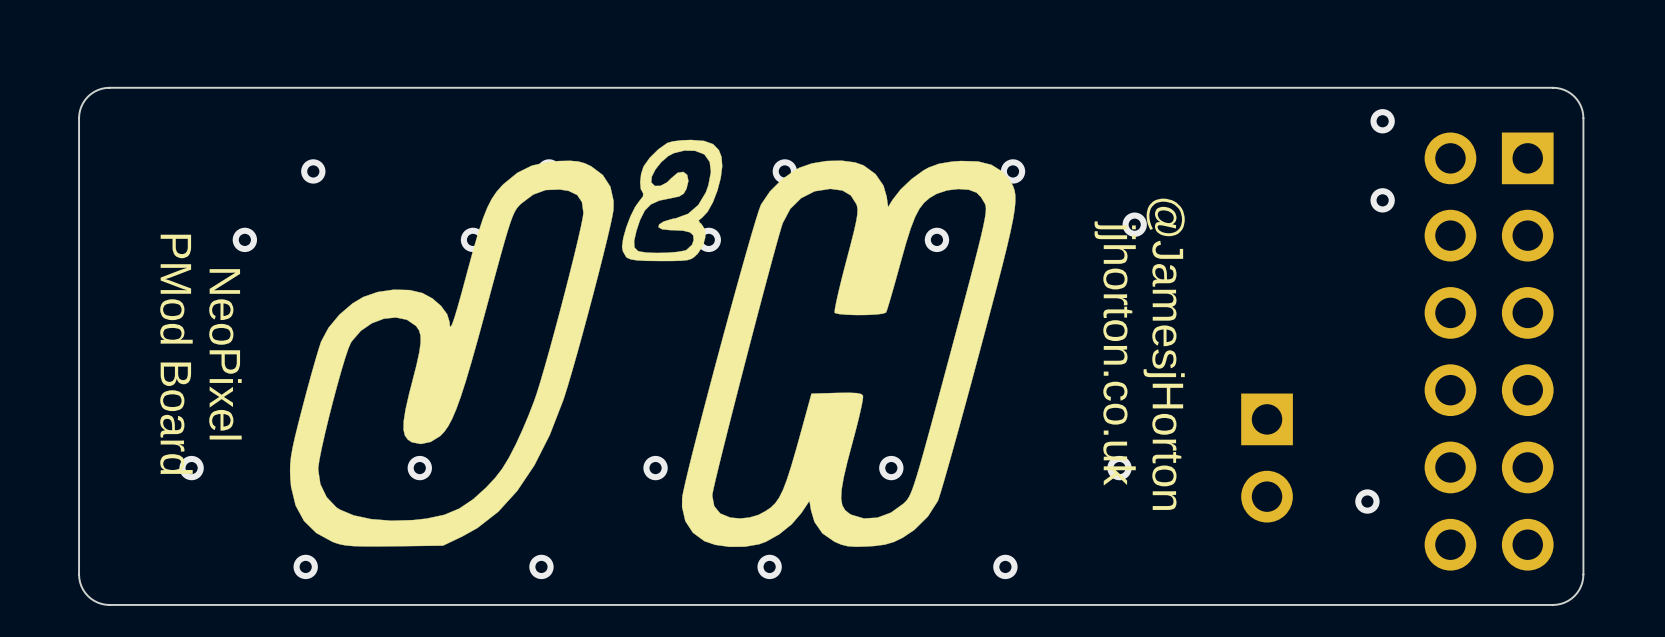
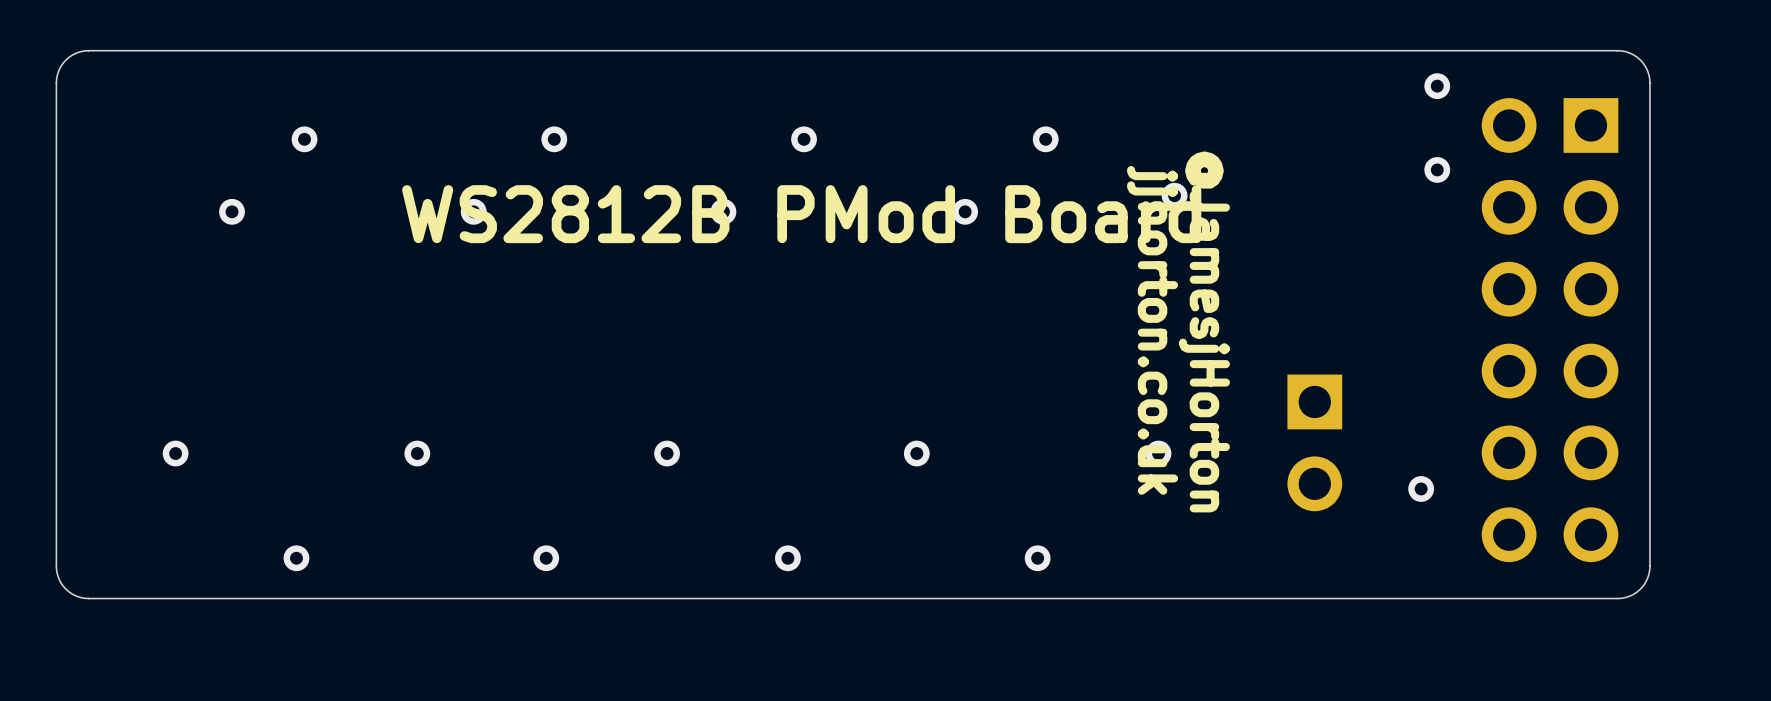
drawing: [289, 139, 1016, 547] -> none
text: none -> WS2812B PMod Board (801, 214)
text: PMod Board (176, 354) -> none
text: NeoPixel (225, 354) -> none

